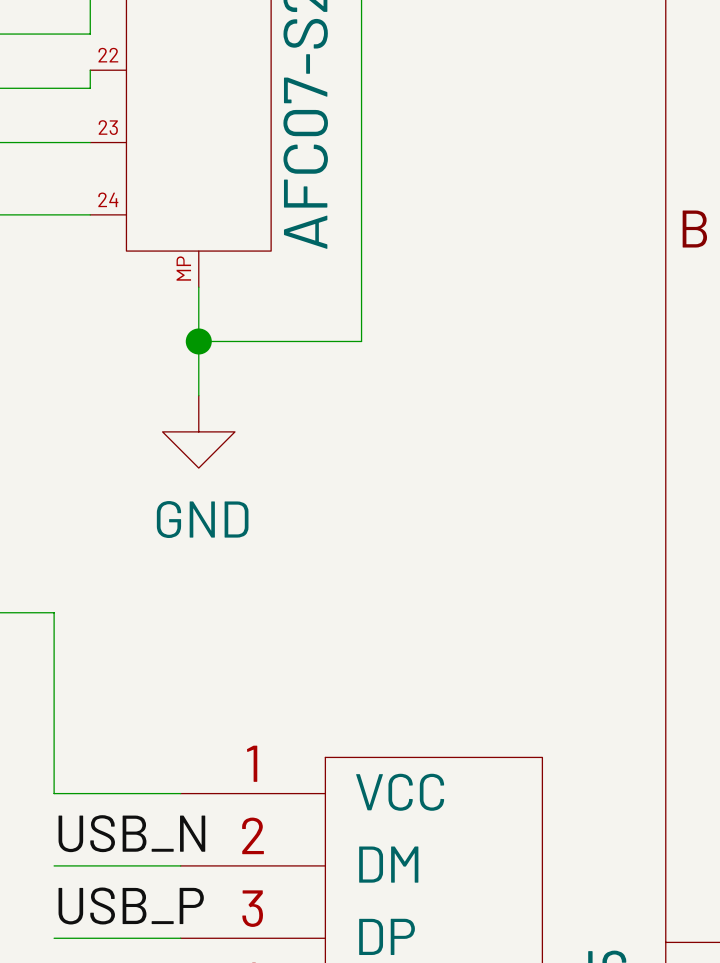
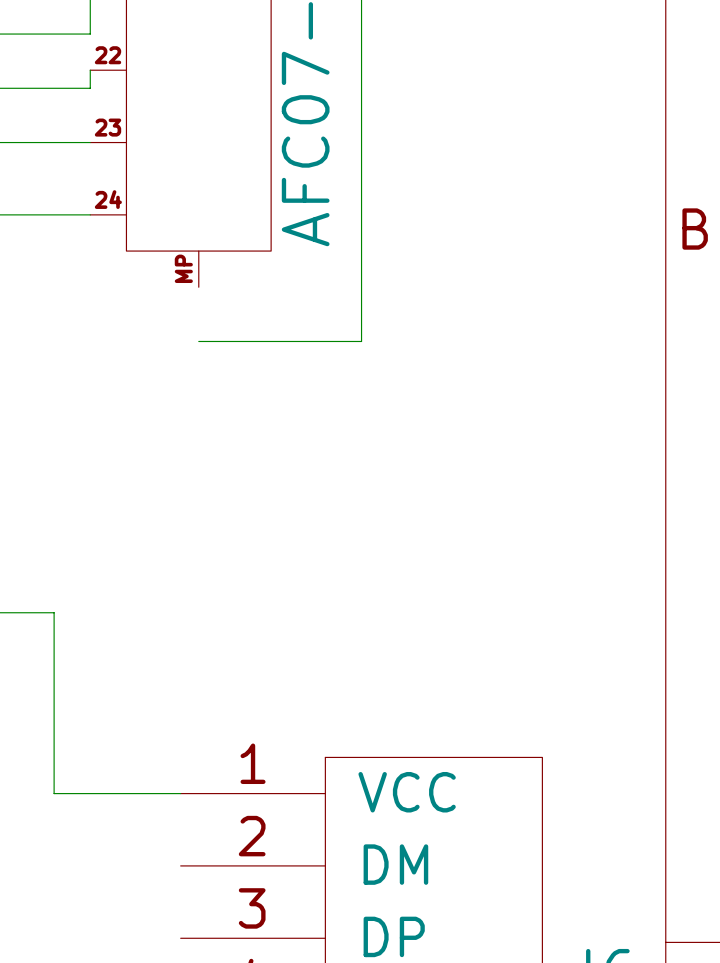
wire: (198, 287) (198, 395) -> none
junction: (198, 341) -> none
power symbol: GND (198, 431) -> none
label: USB_N (131, 833) -> none
wire: (54, 865) (180, 865) -> none
label: USB_P (131, 905) -> none
wire: (54, 938) (180, 938) -> none

